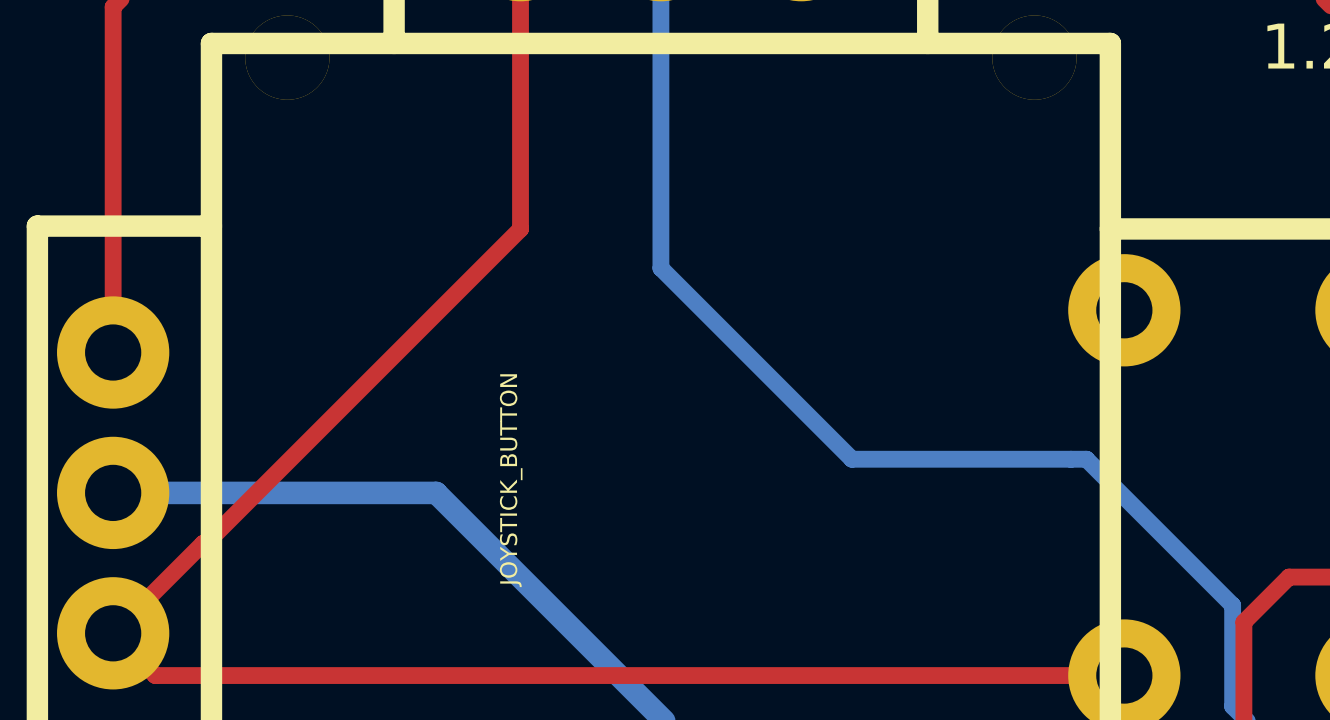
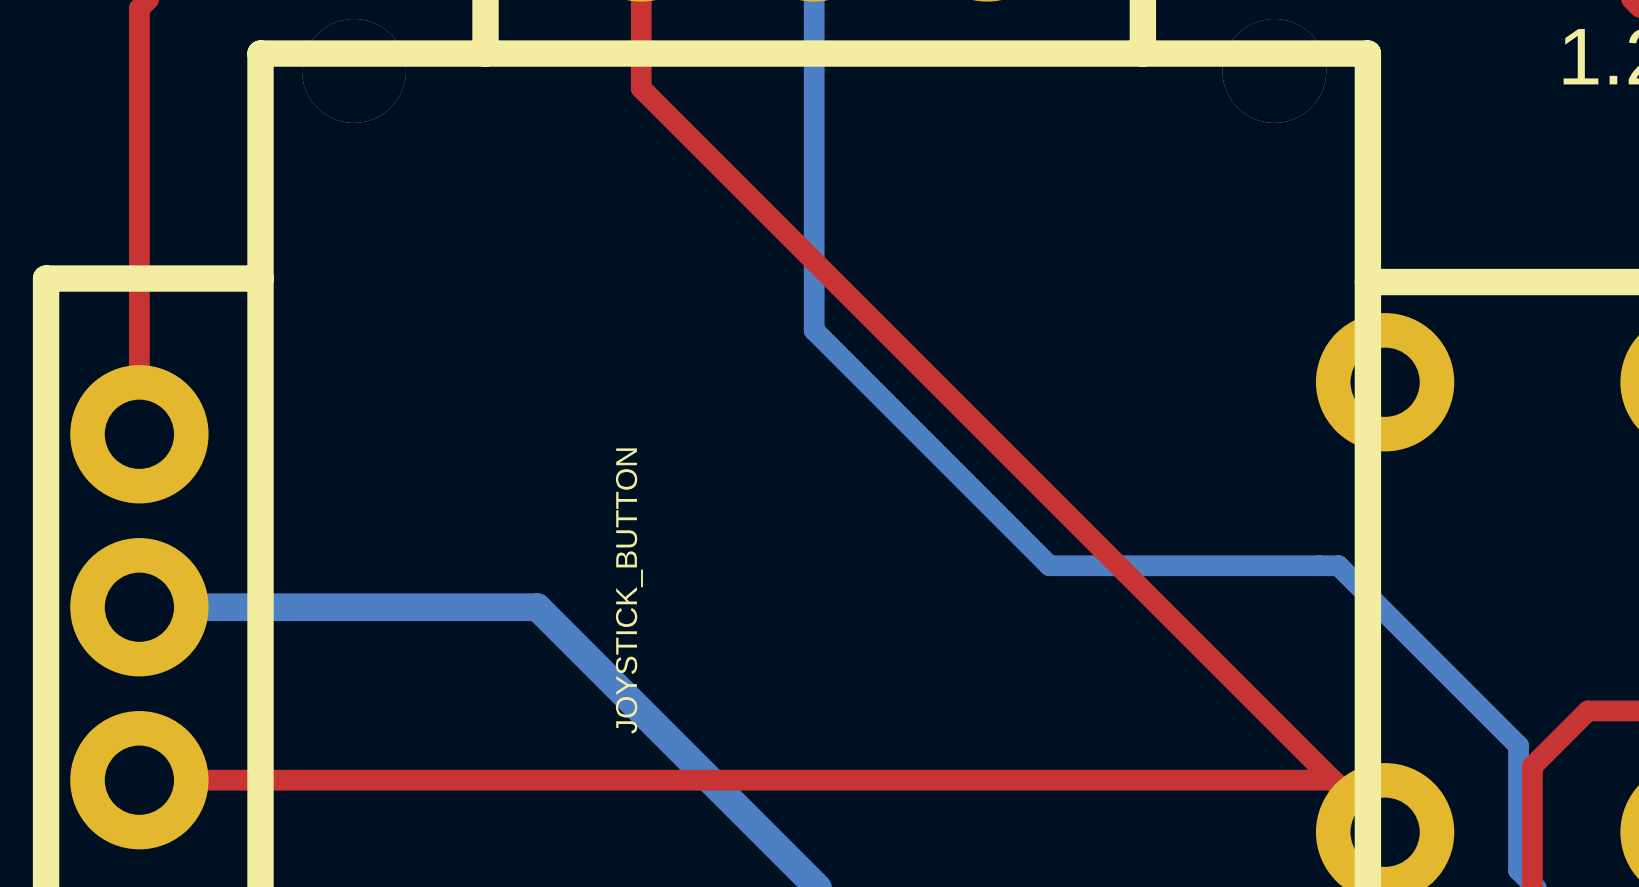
top track: (520, 71) (520, 229) (206, 543) (203, 543) (113, 633) (155, 675) (1124, 675) -> (641, 88) (1385, 832)
top track: none -> (139, 780) (1333, 780)

